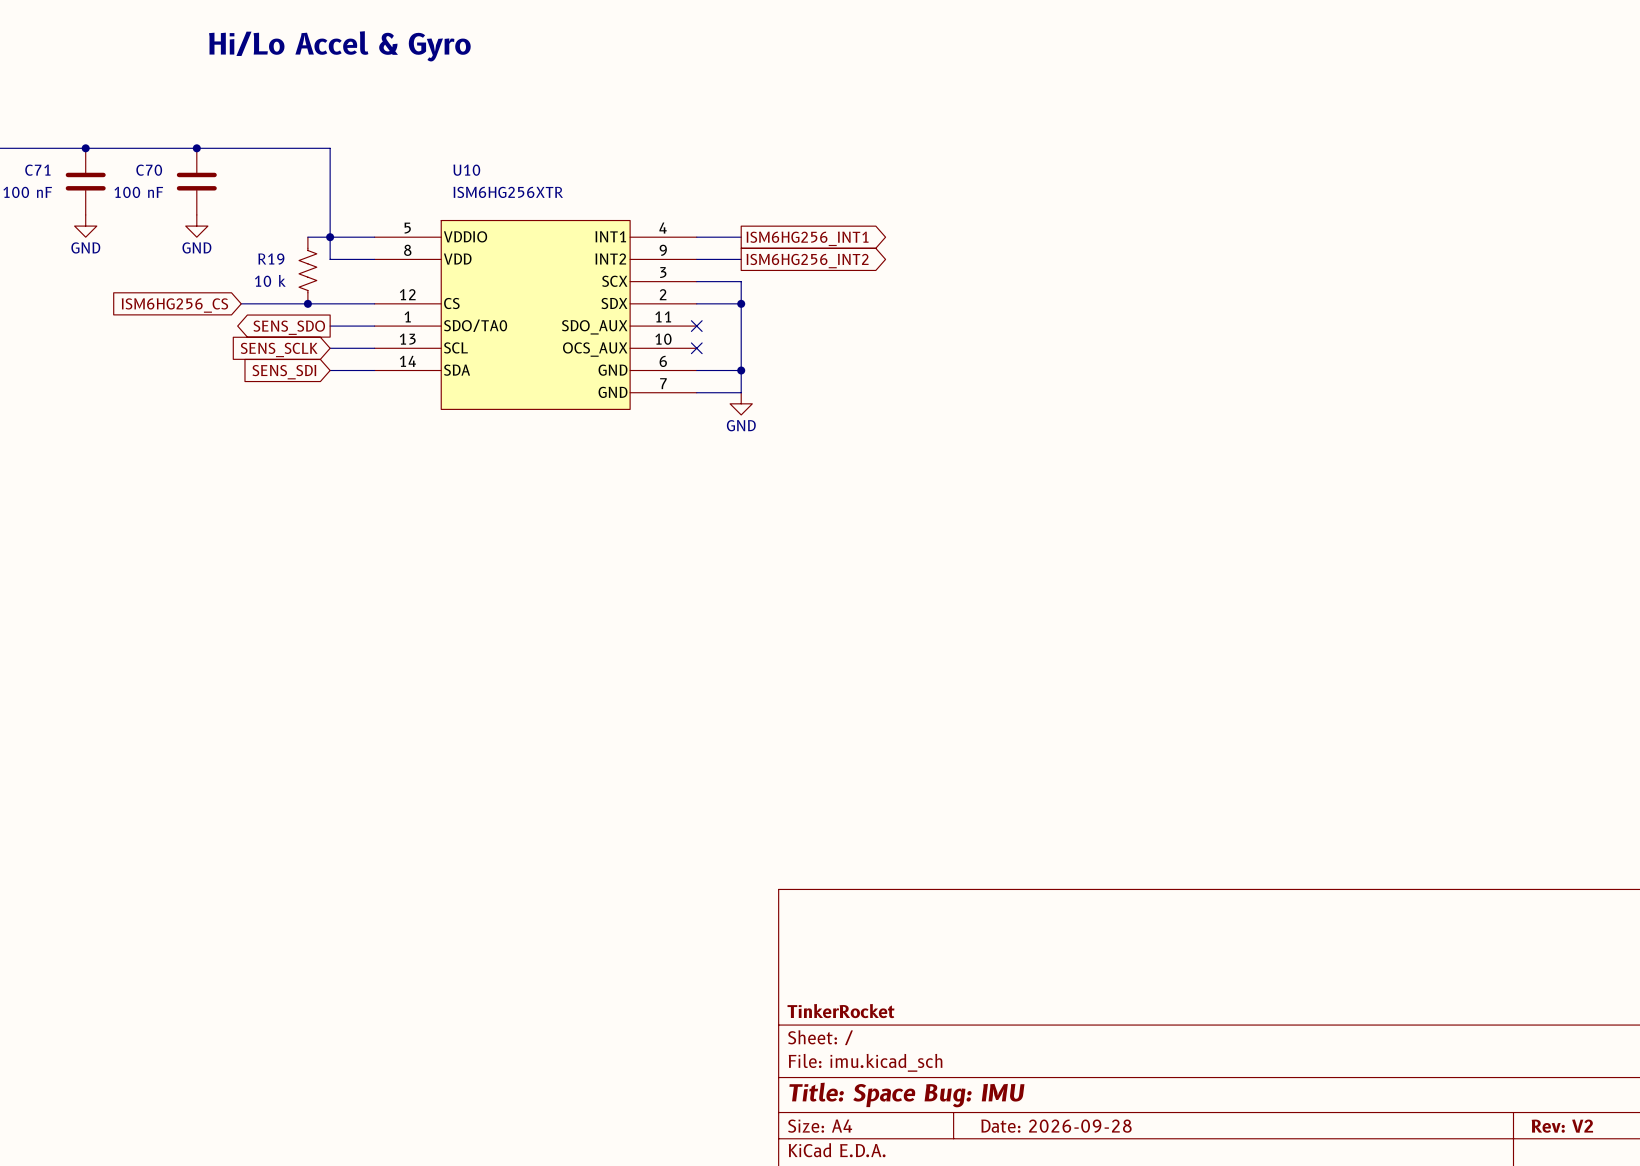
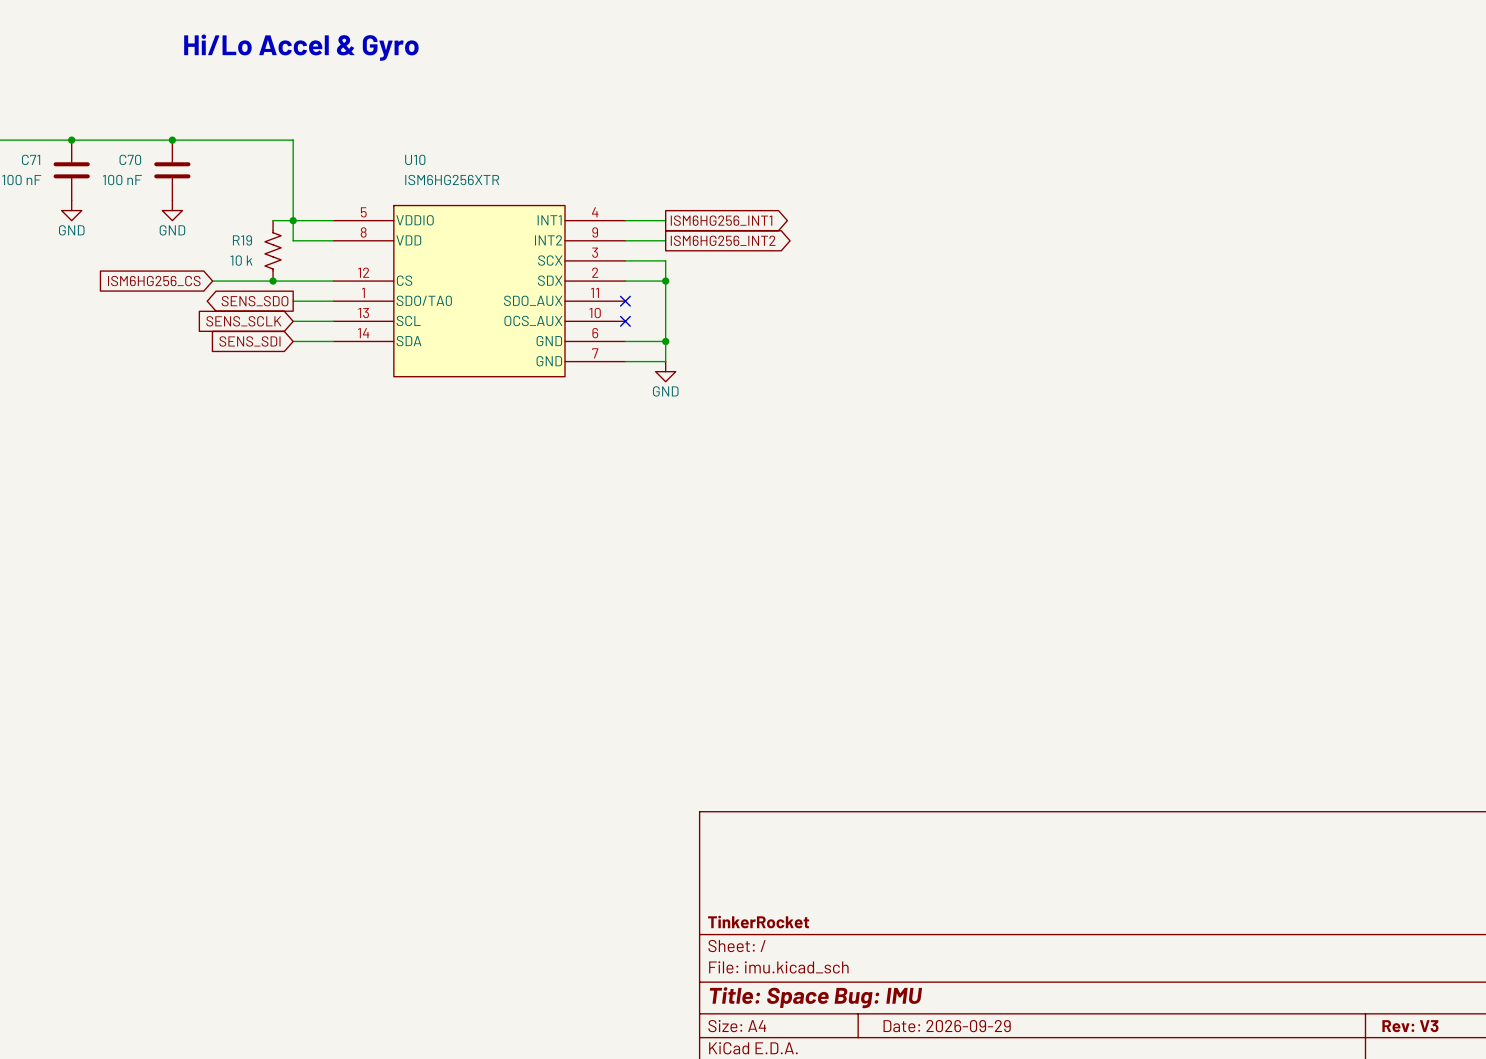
title block: Date: 2026-09-28 (1056, 1126) -> Date: 2026-09-29 (947, 1026)
title block: Rev: V2 (1562, 1126) -> Rev: V3 (1410, 1026)

